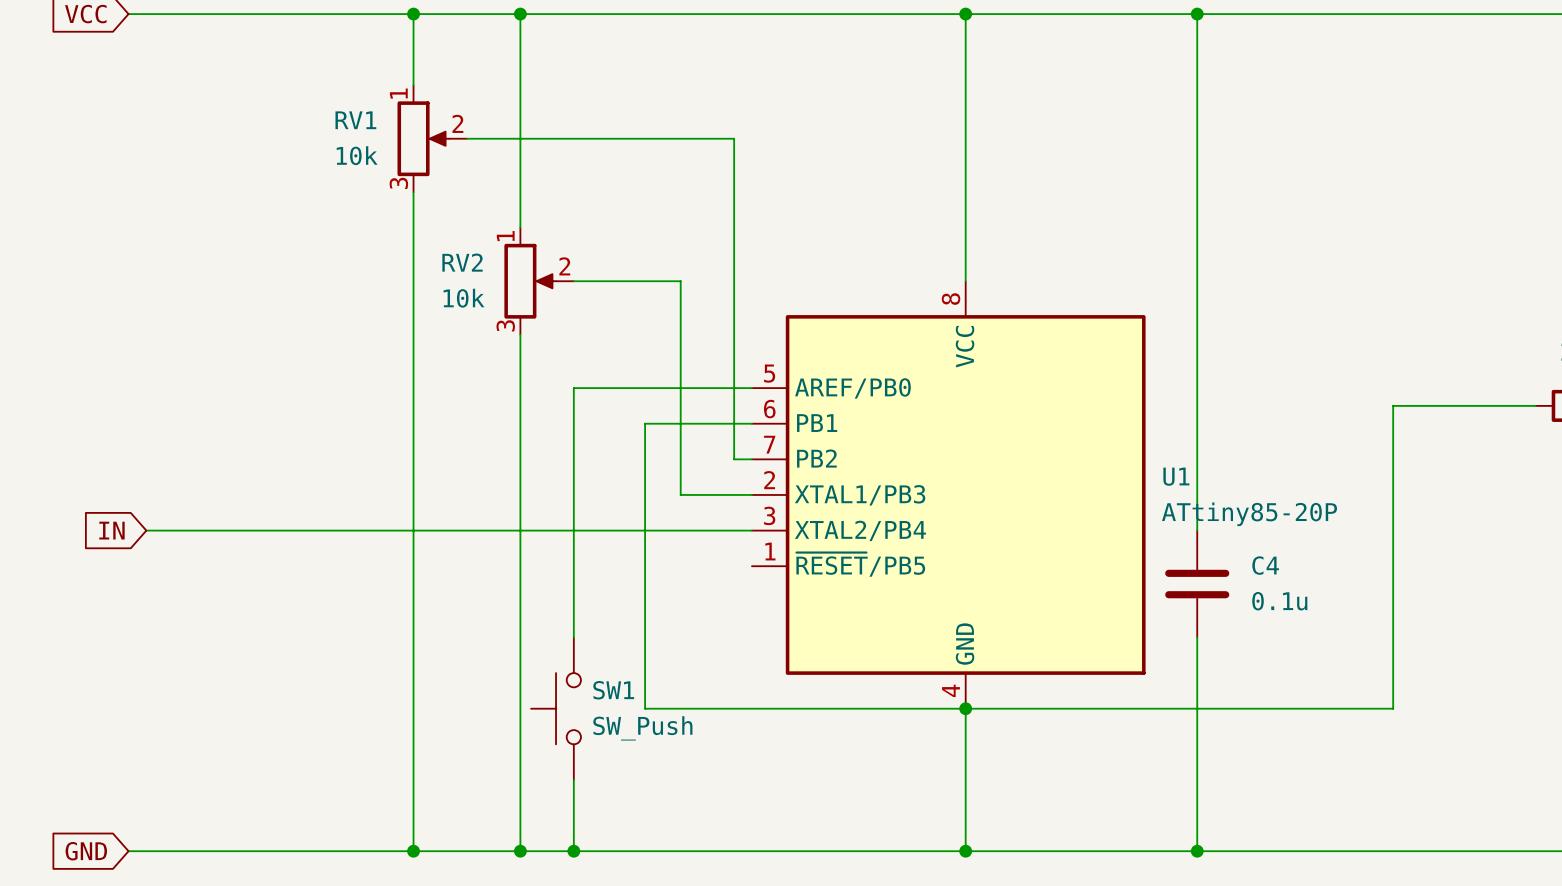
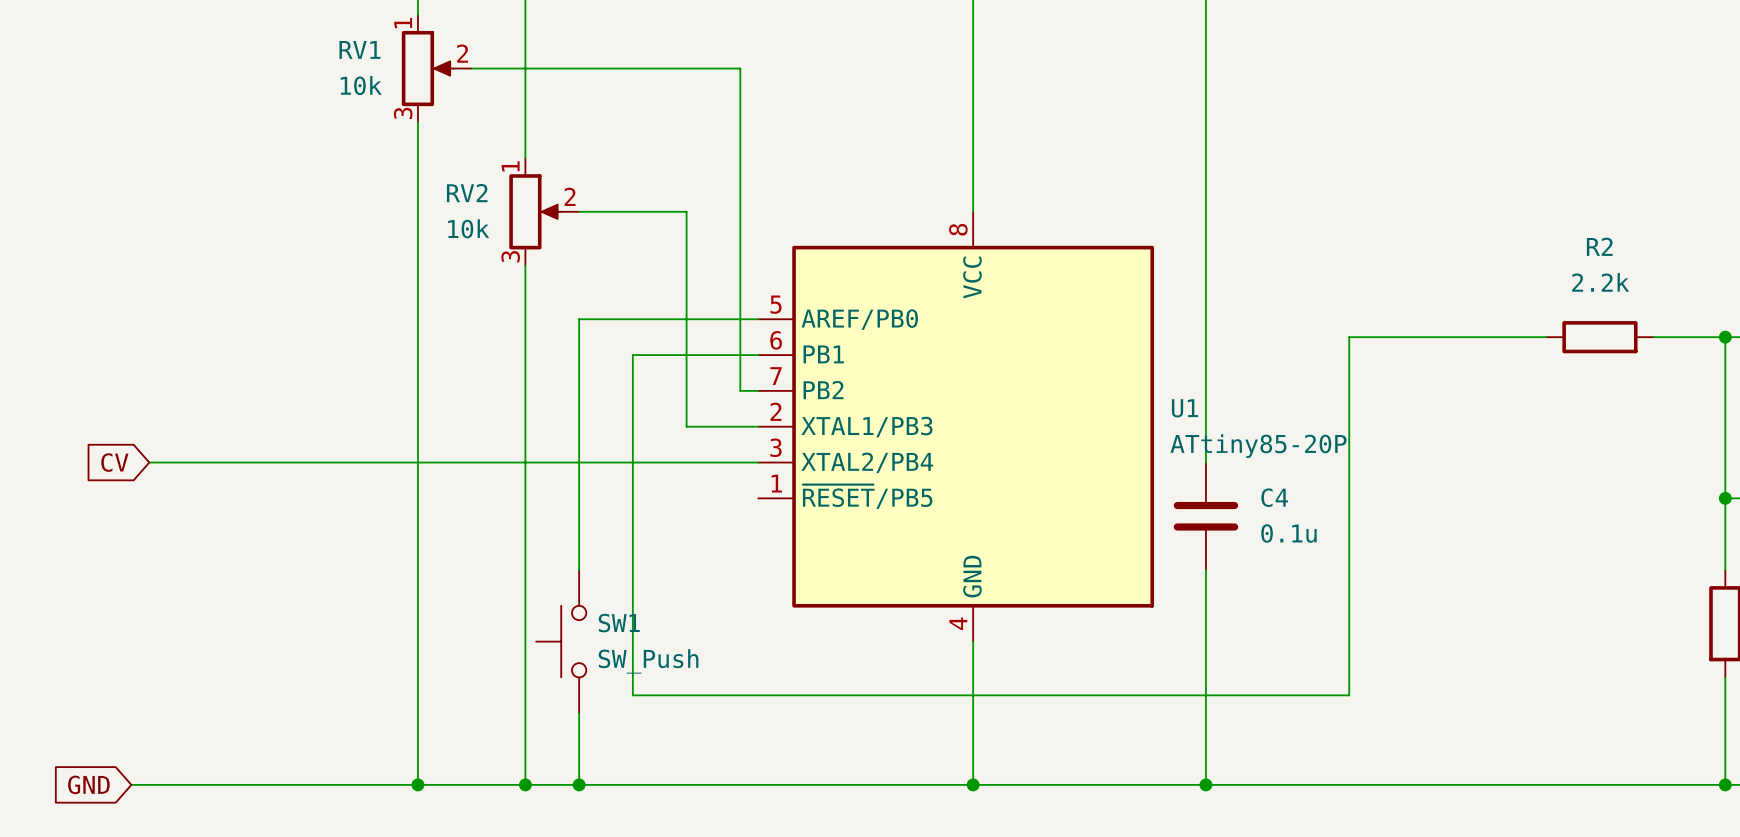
wire: (1393, 405) (1393, 708) (645, 708) (645, 423) -> (1402, 337) (1349, 337) (1349, 695) (632, 695) (632, 355) (650, 355)
global label: IN (111, 530) -> CV (114, 462)
junction: (965, 708) -> none

